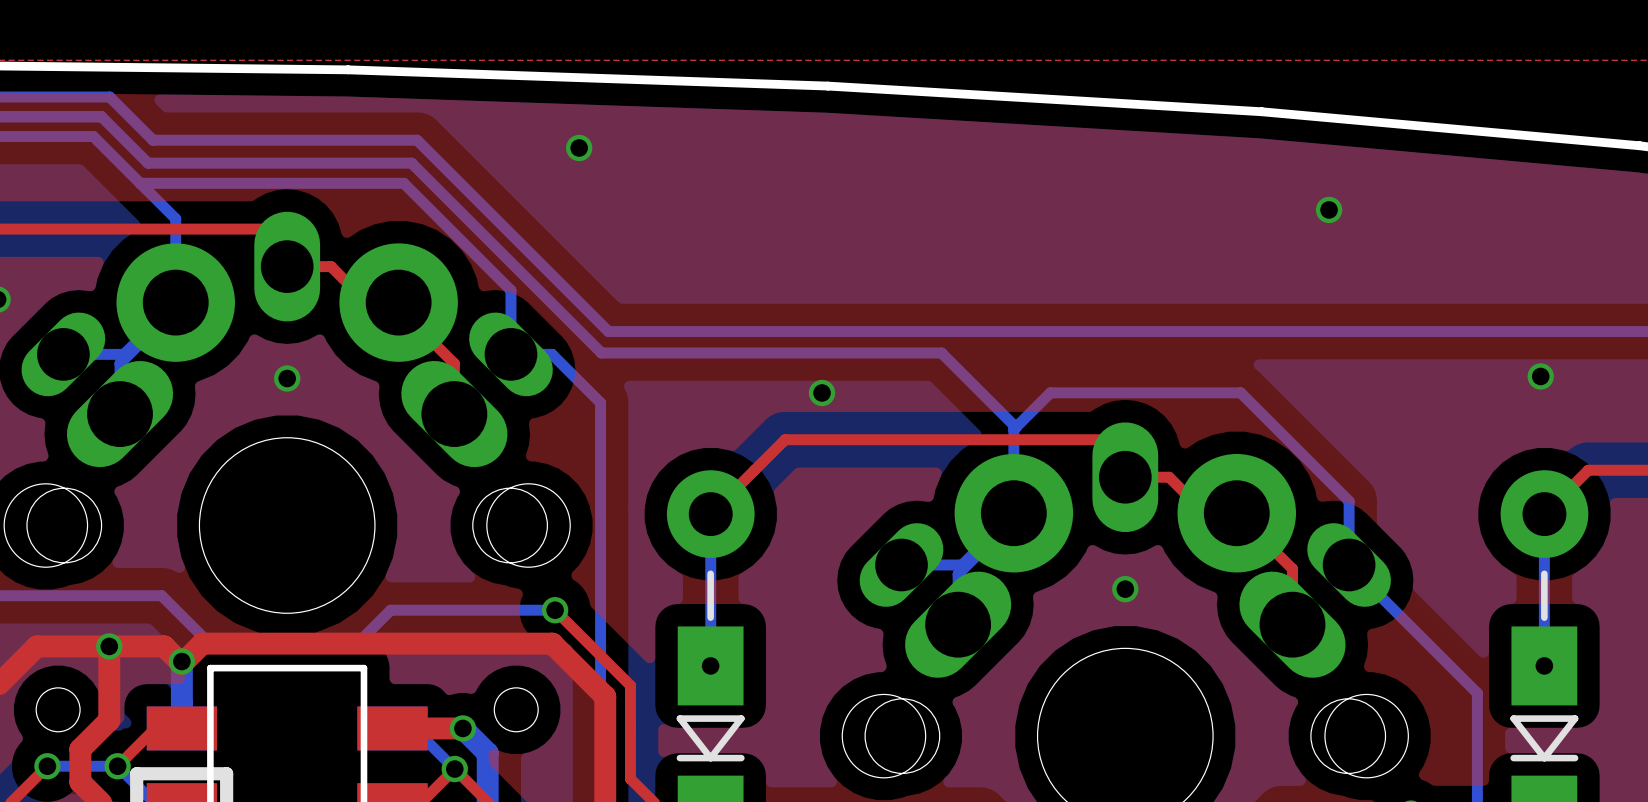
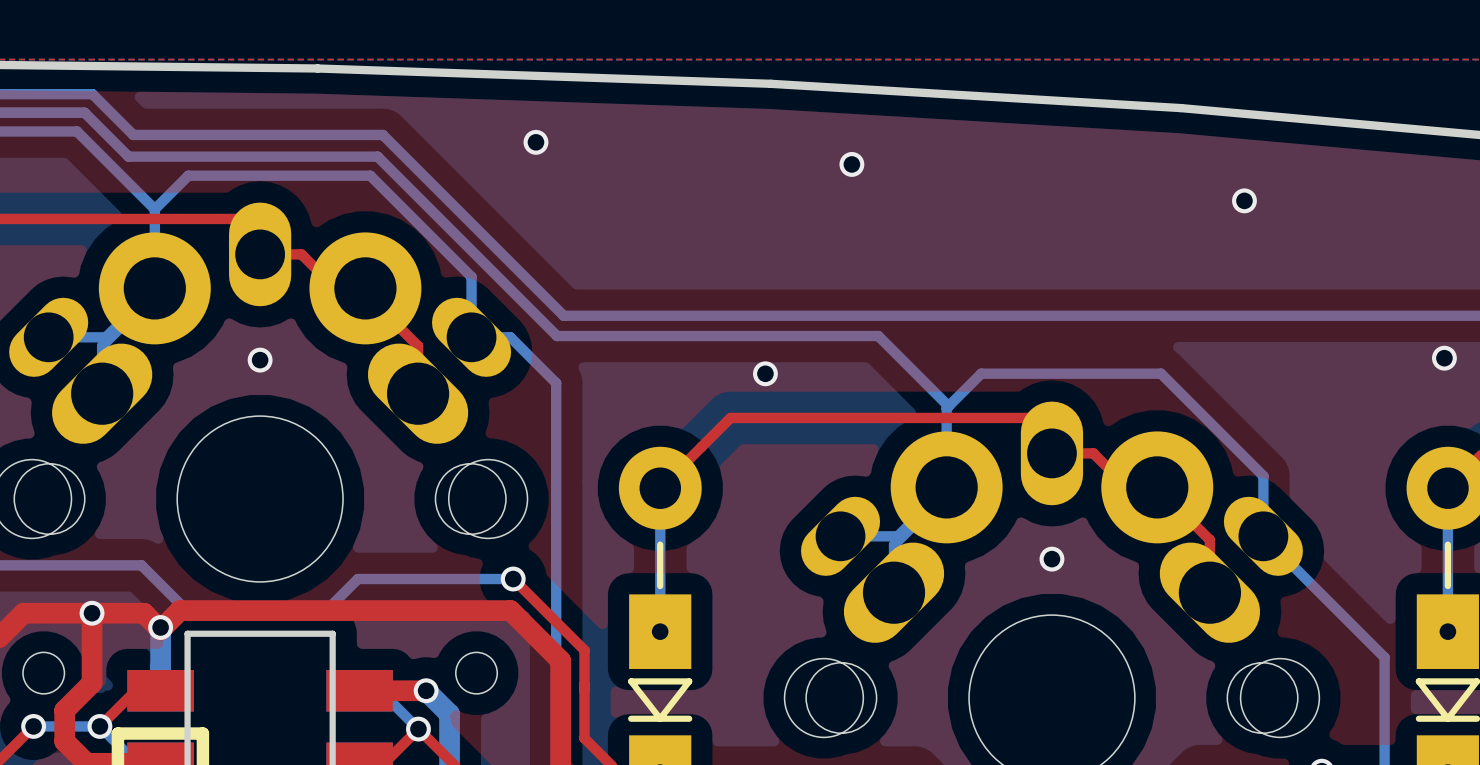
via: none -> (851, 164)
bottom track: (141, 183) (211, 183) -> (154, 209) (188, 175)

